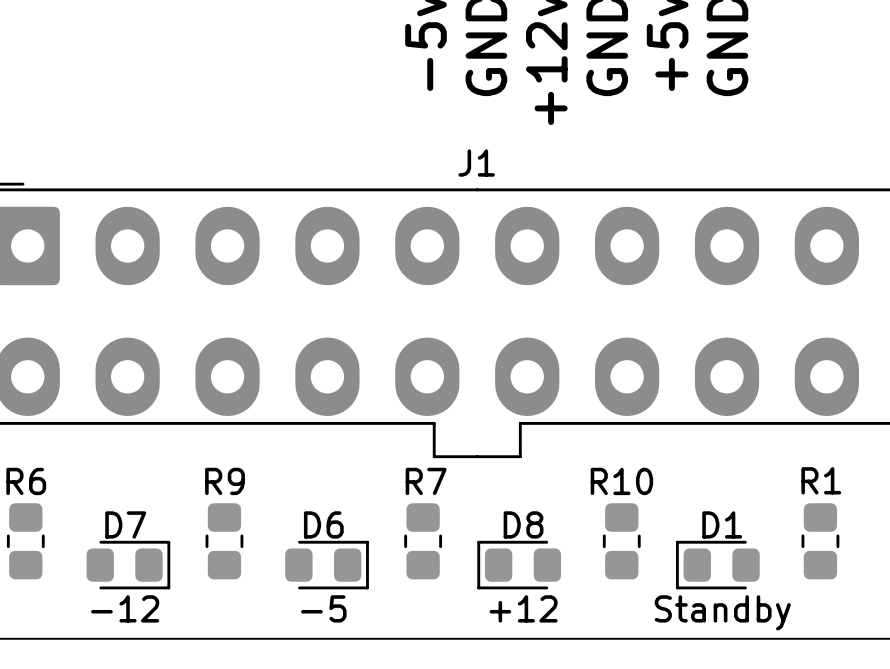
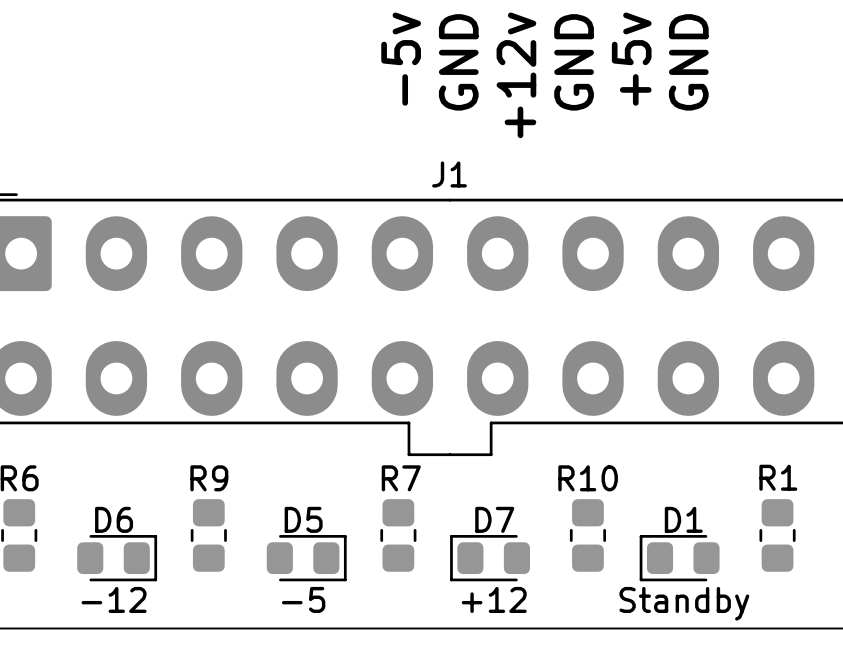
D7 name: D7 (125, 524) -> D6 (114, 519)
D6 name: D6 (323, 524) -> D5 (303, 519)
D8 name: D8 (523, 524) -> D7 (494, 519)

